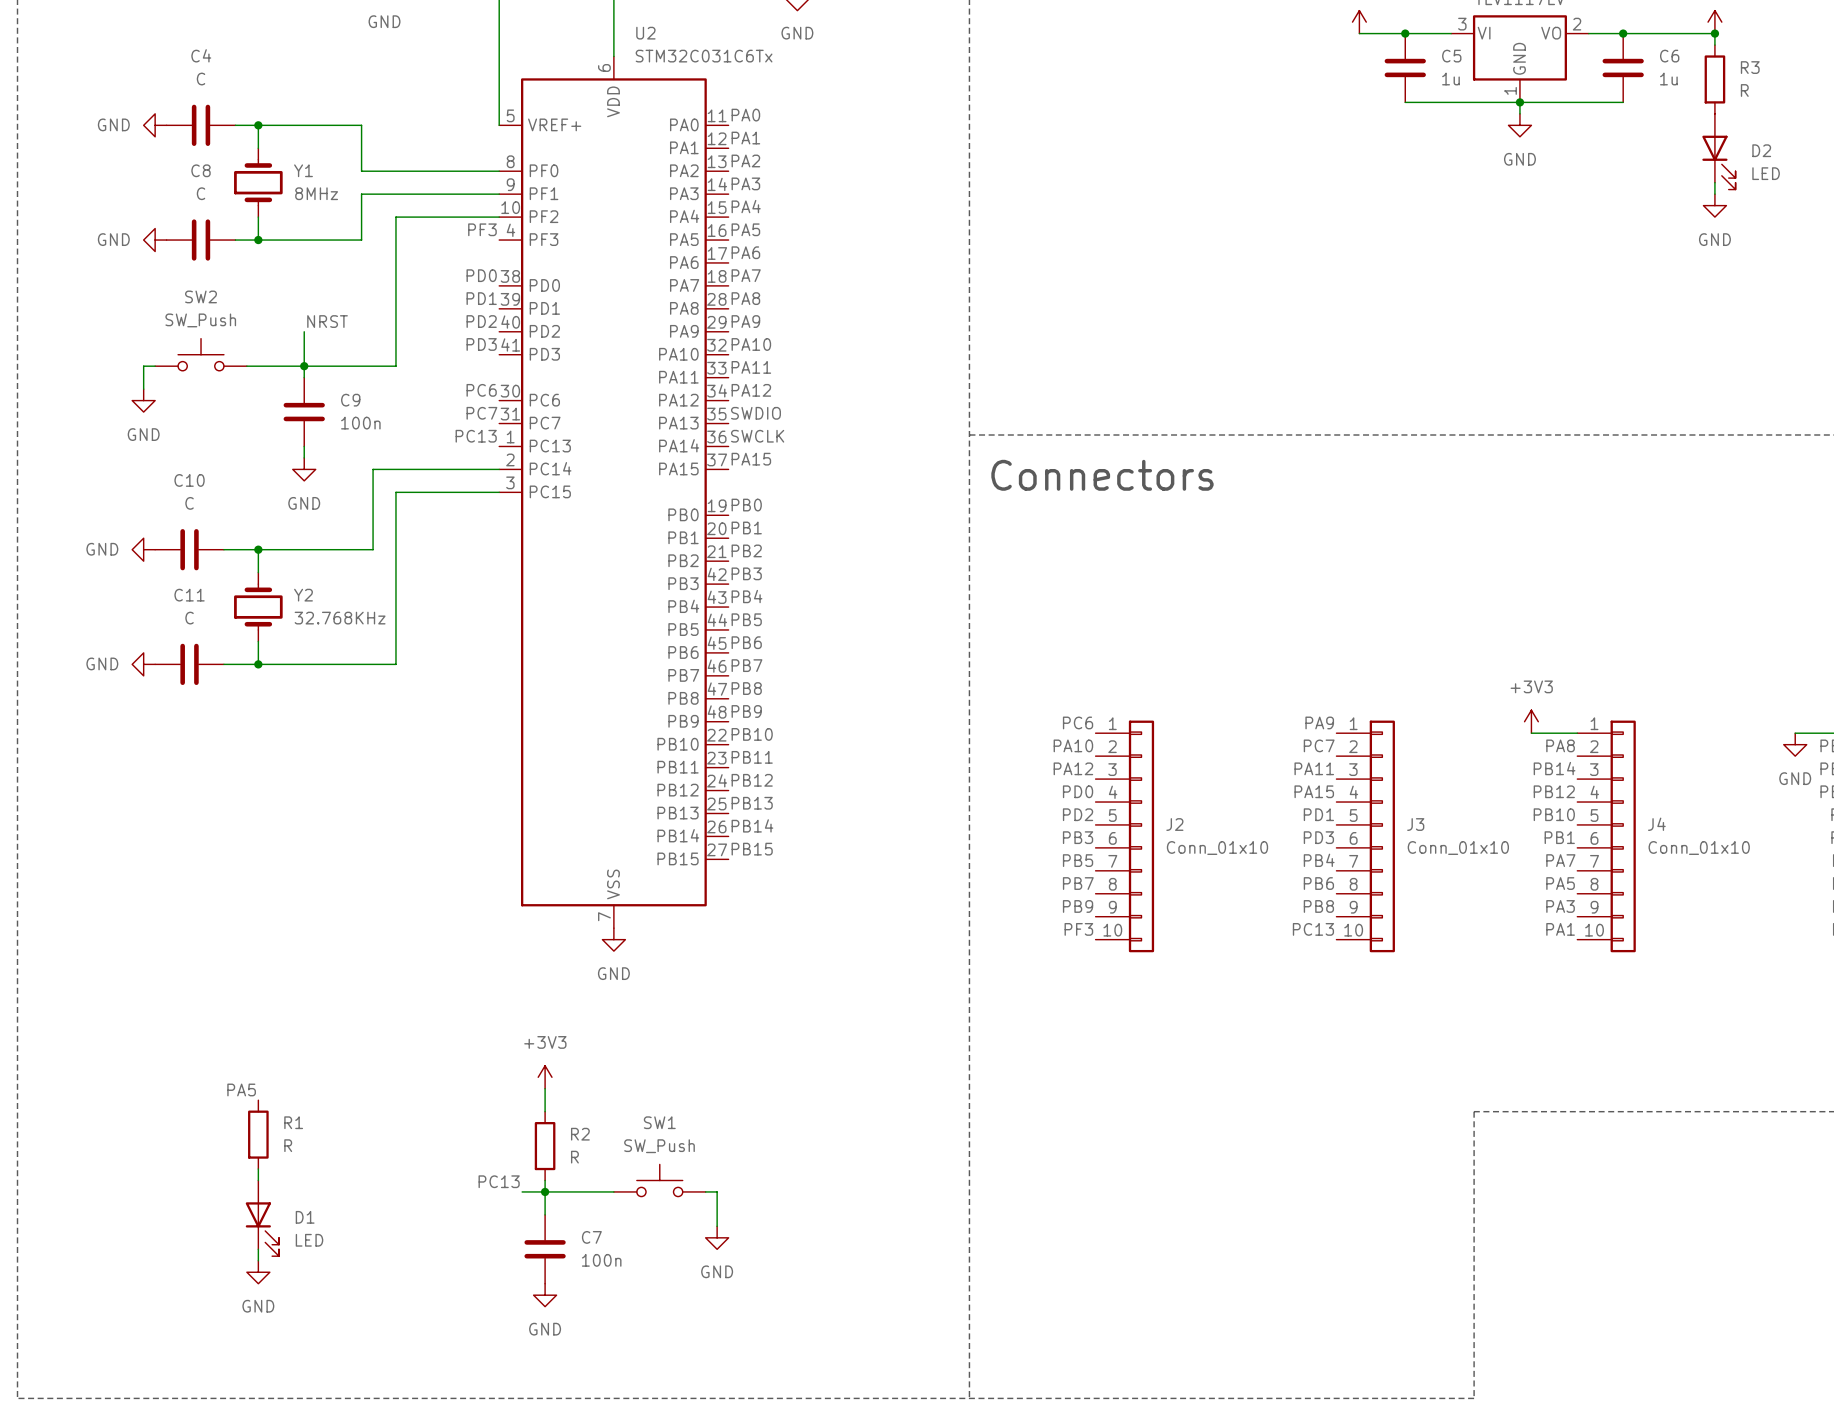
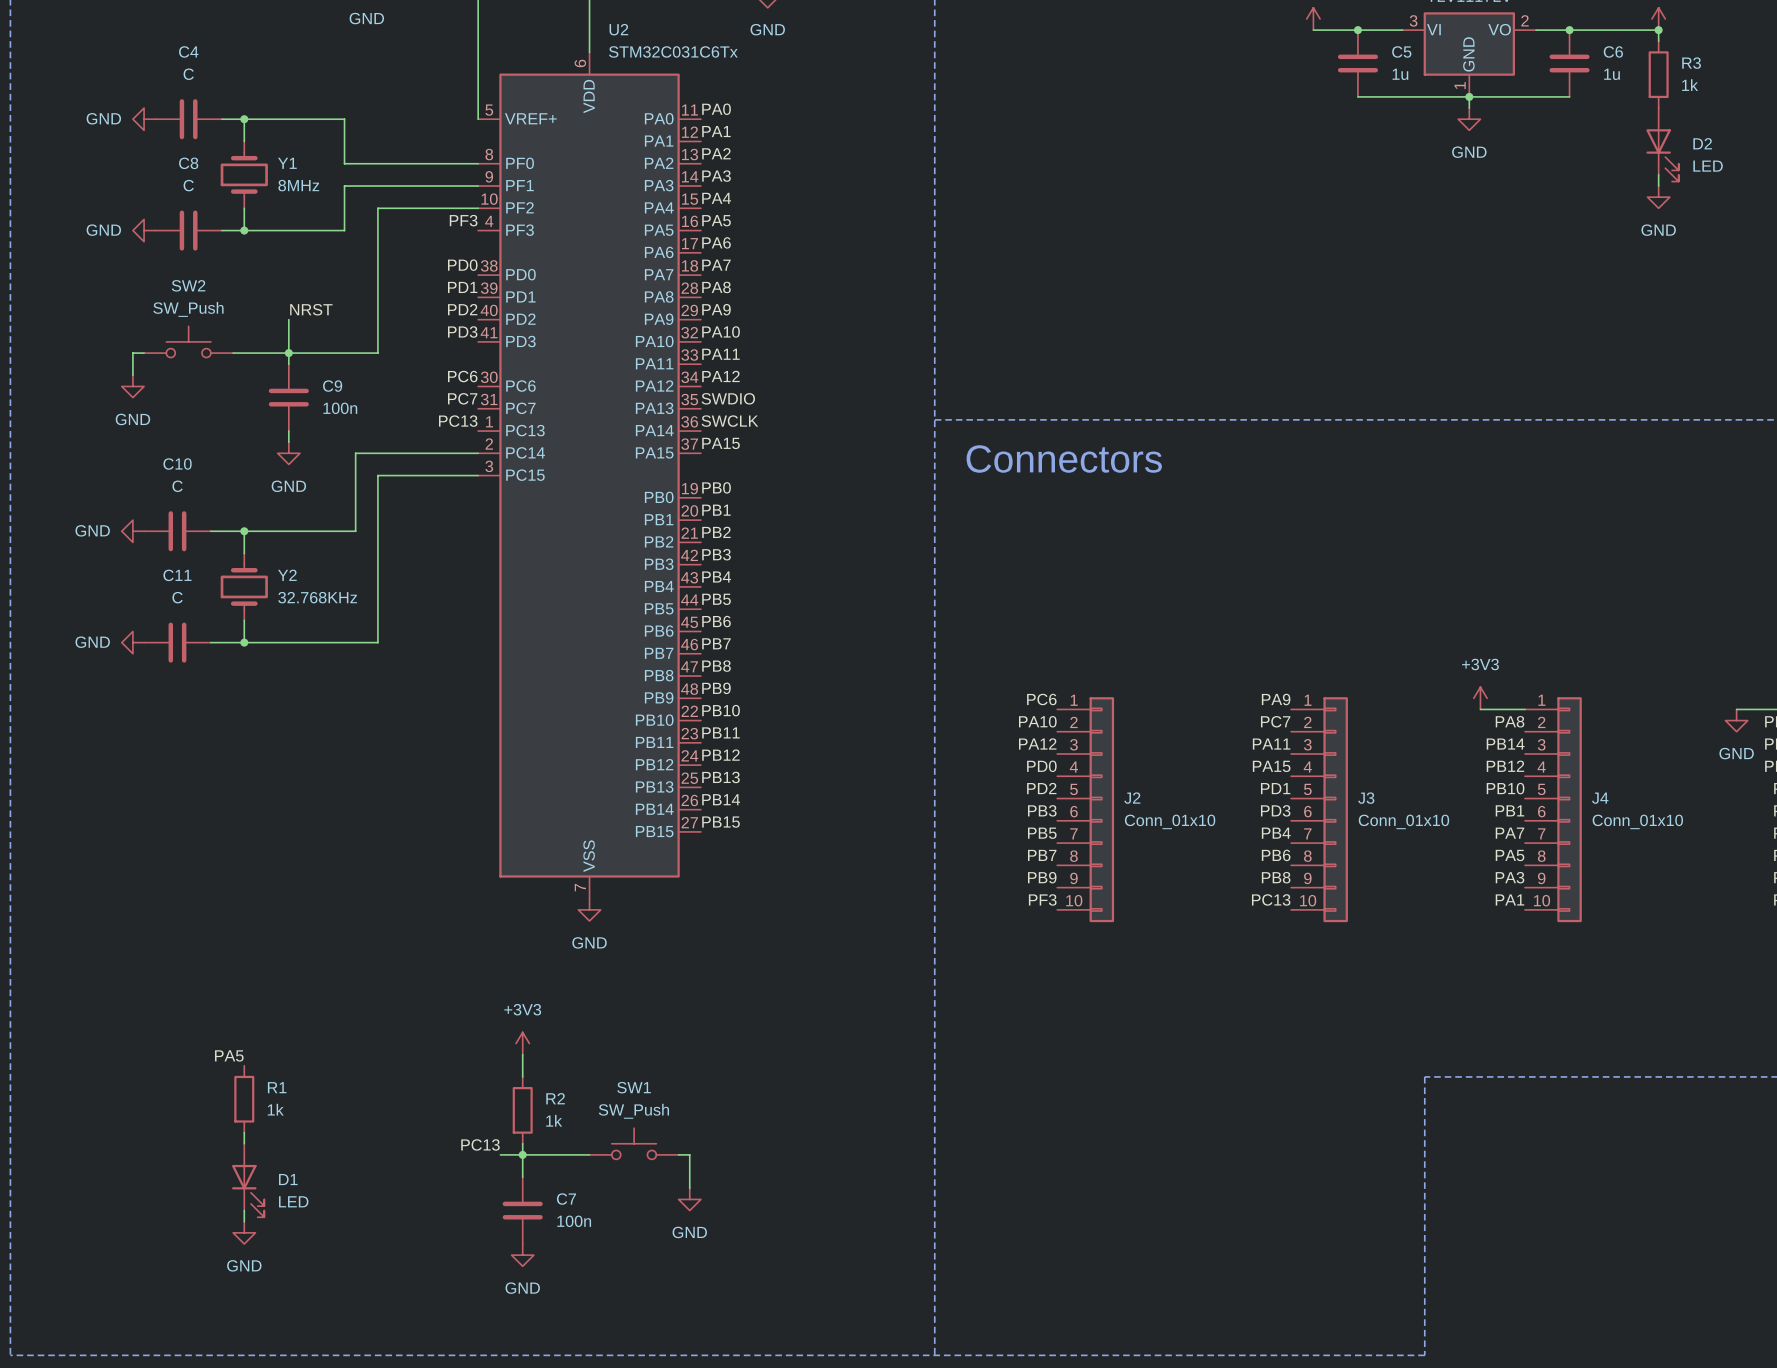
R3 value: R (1744, 90) -> 1k (1690, 85)
R1 value: R (288, 1145) -> 1k (275, 1109)
R2 value: R (574, 1157) -> 1k (554, 1120)

